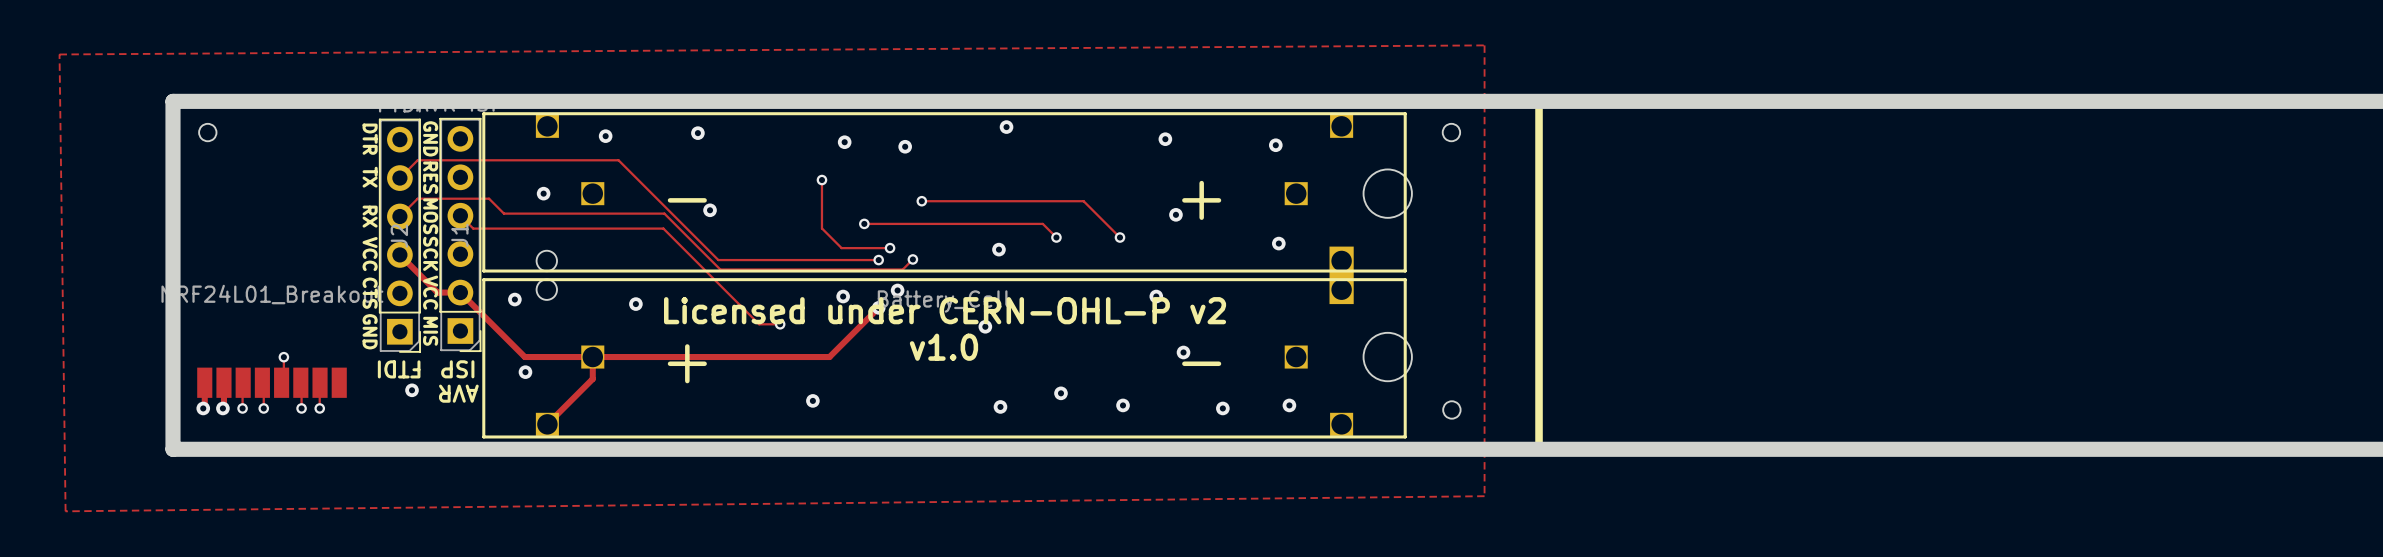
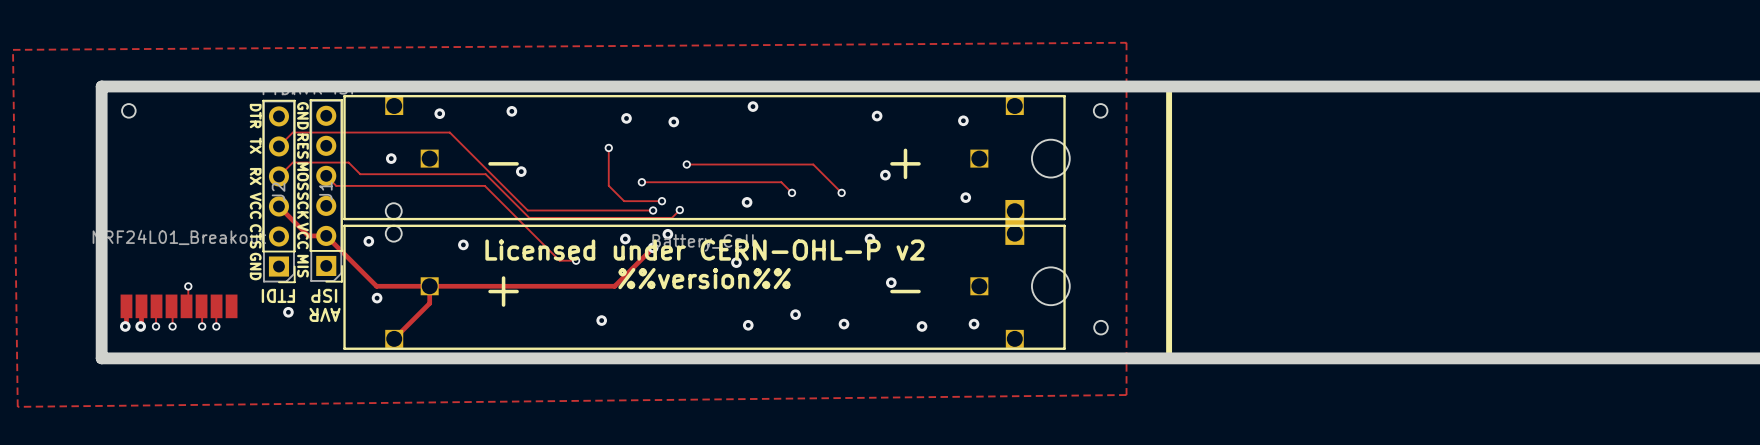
text: v1.0 (943, 347) -> %%version%% (704, 278)

